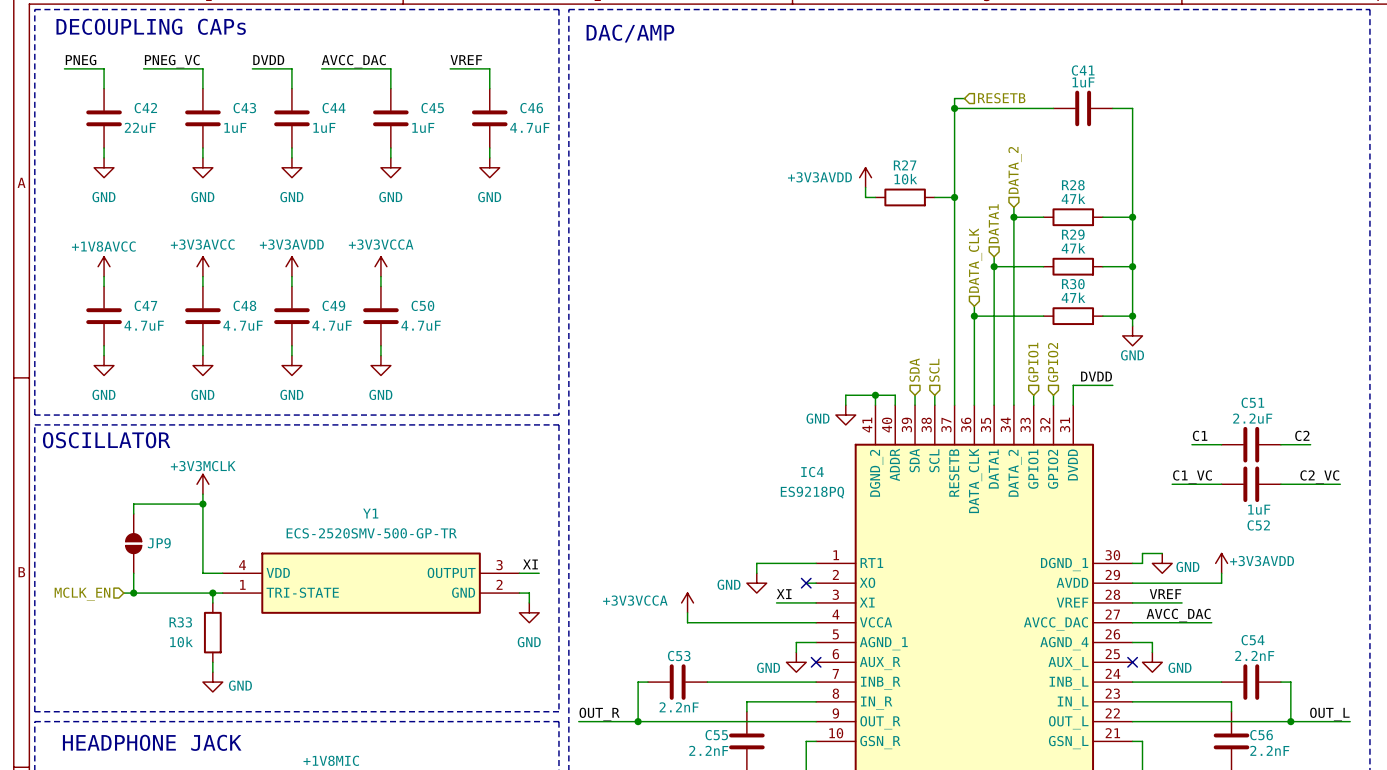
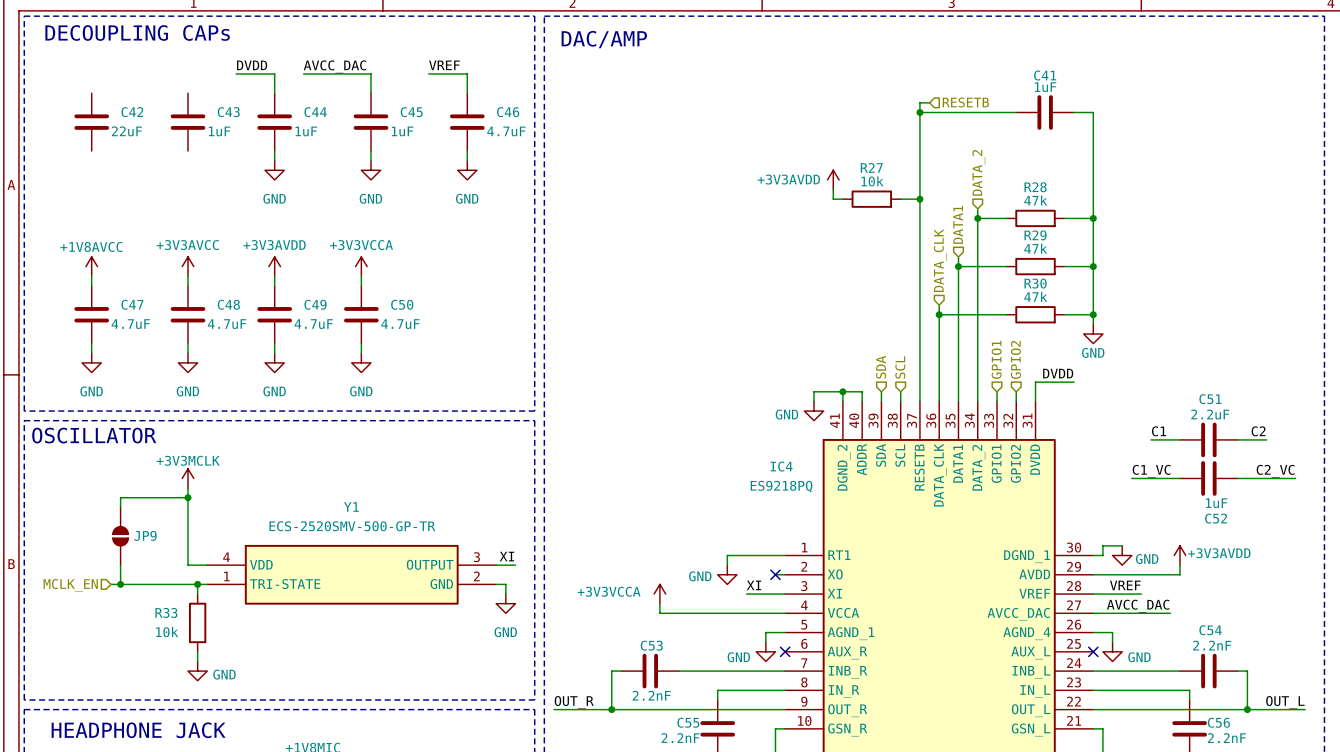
label: PNEG (81, 60) -> none
label: PNEG_VC (172, 61) -> none
wire: (64, 68) (104, 68) (104, 88) -> none
wire: (143, 68) (202, 68) (202, 88) -> none
wire: (104, 148) (104, 157) -> none
wire: (202, 148) (202, 157) -> none
power symbol: GND (104, 167) -> none
power symbol: GND (202, 167) -> none

